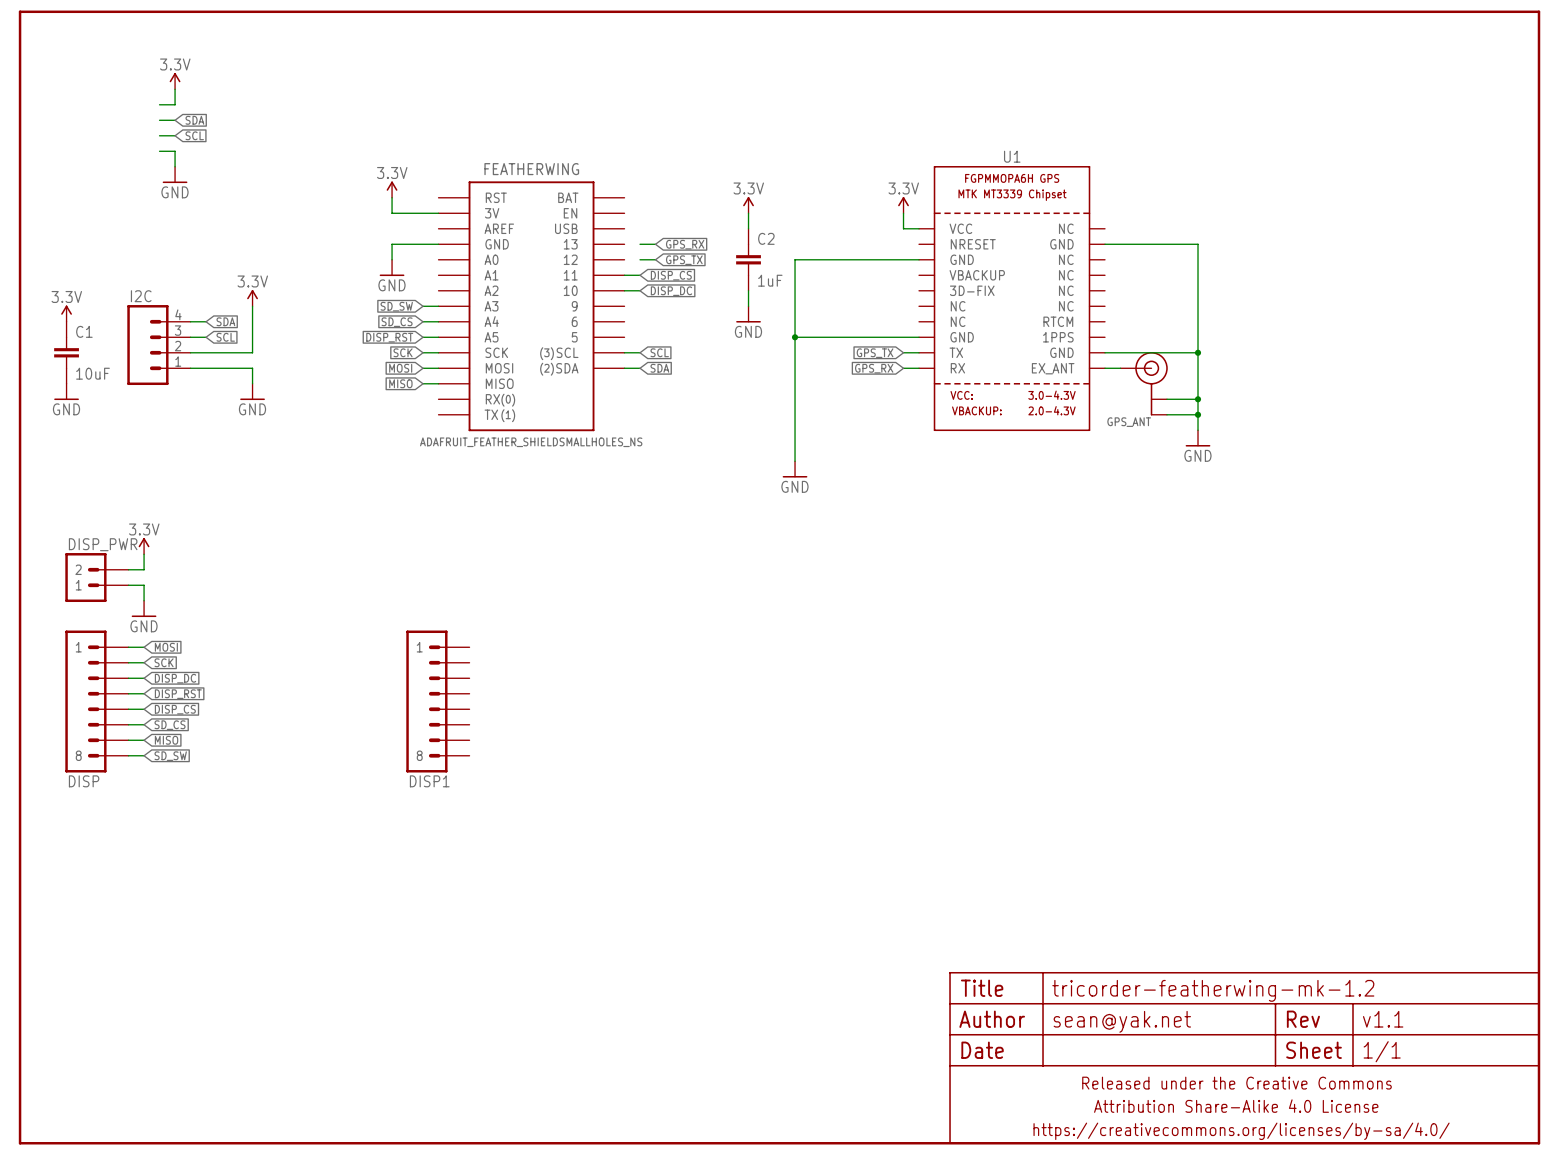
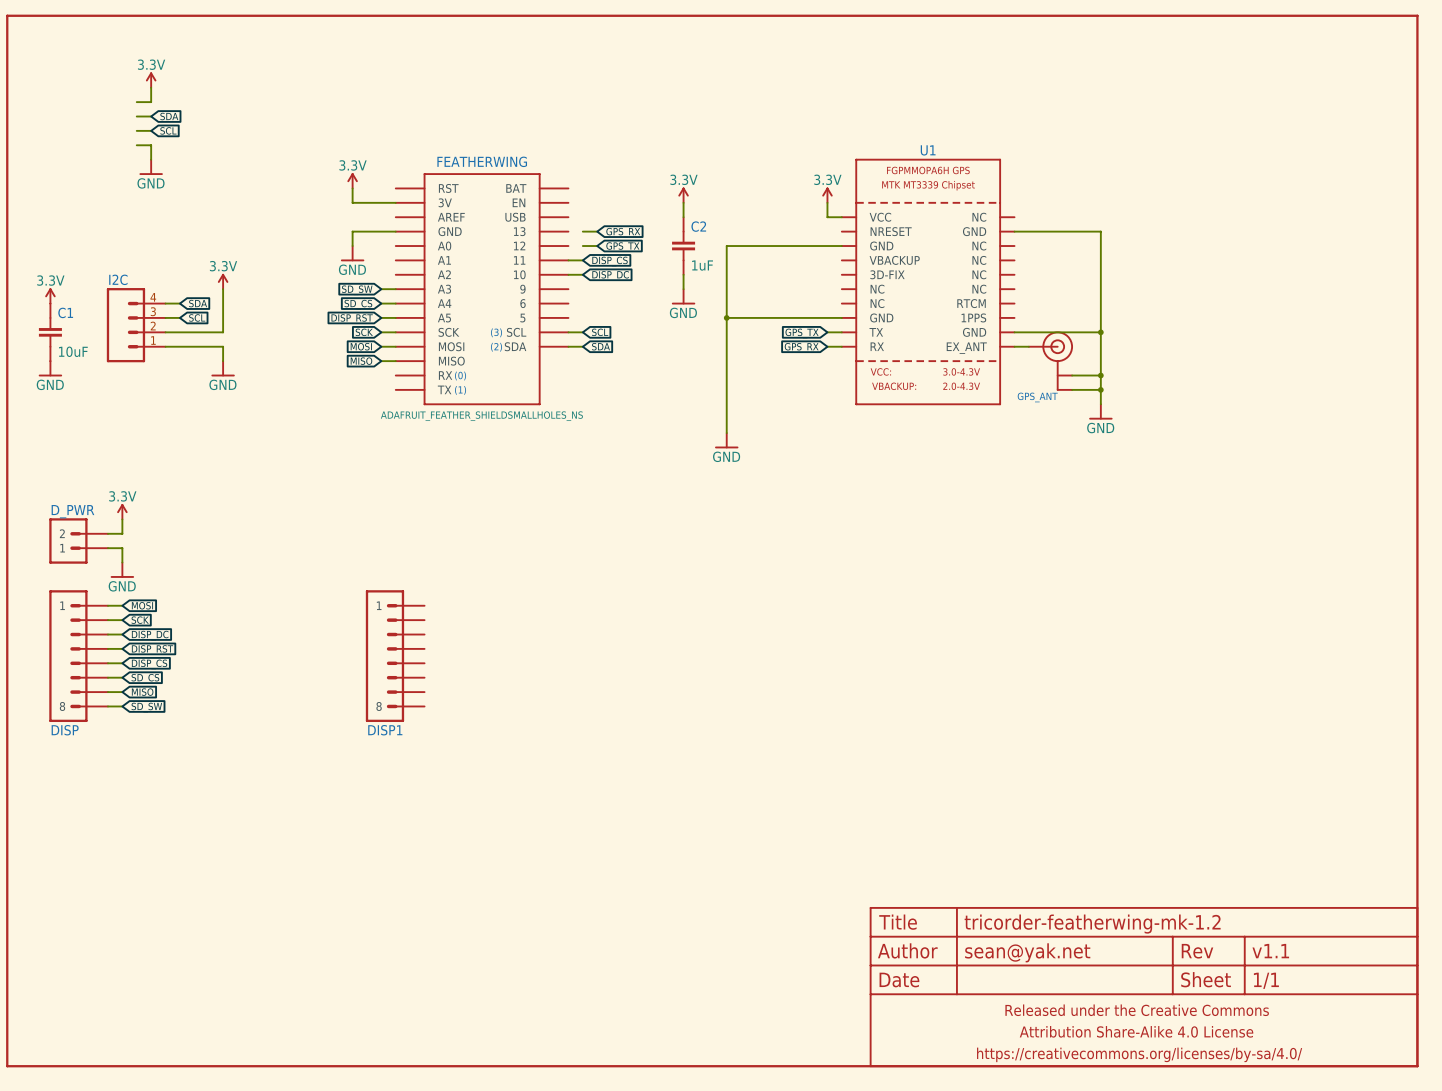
DISP_PWR name: DISP_PWR (103, 544) -> D_PWR (72, 511)

